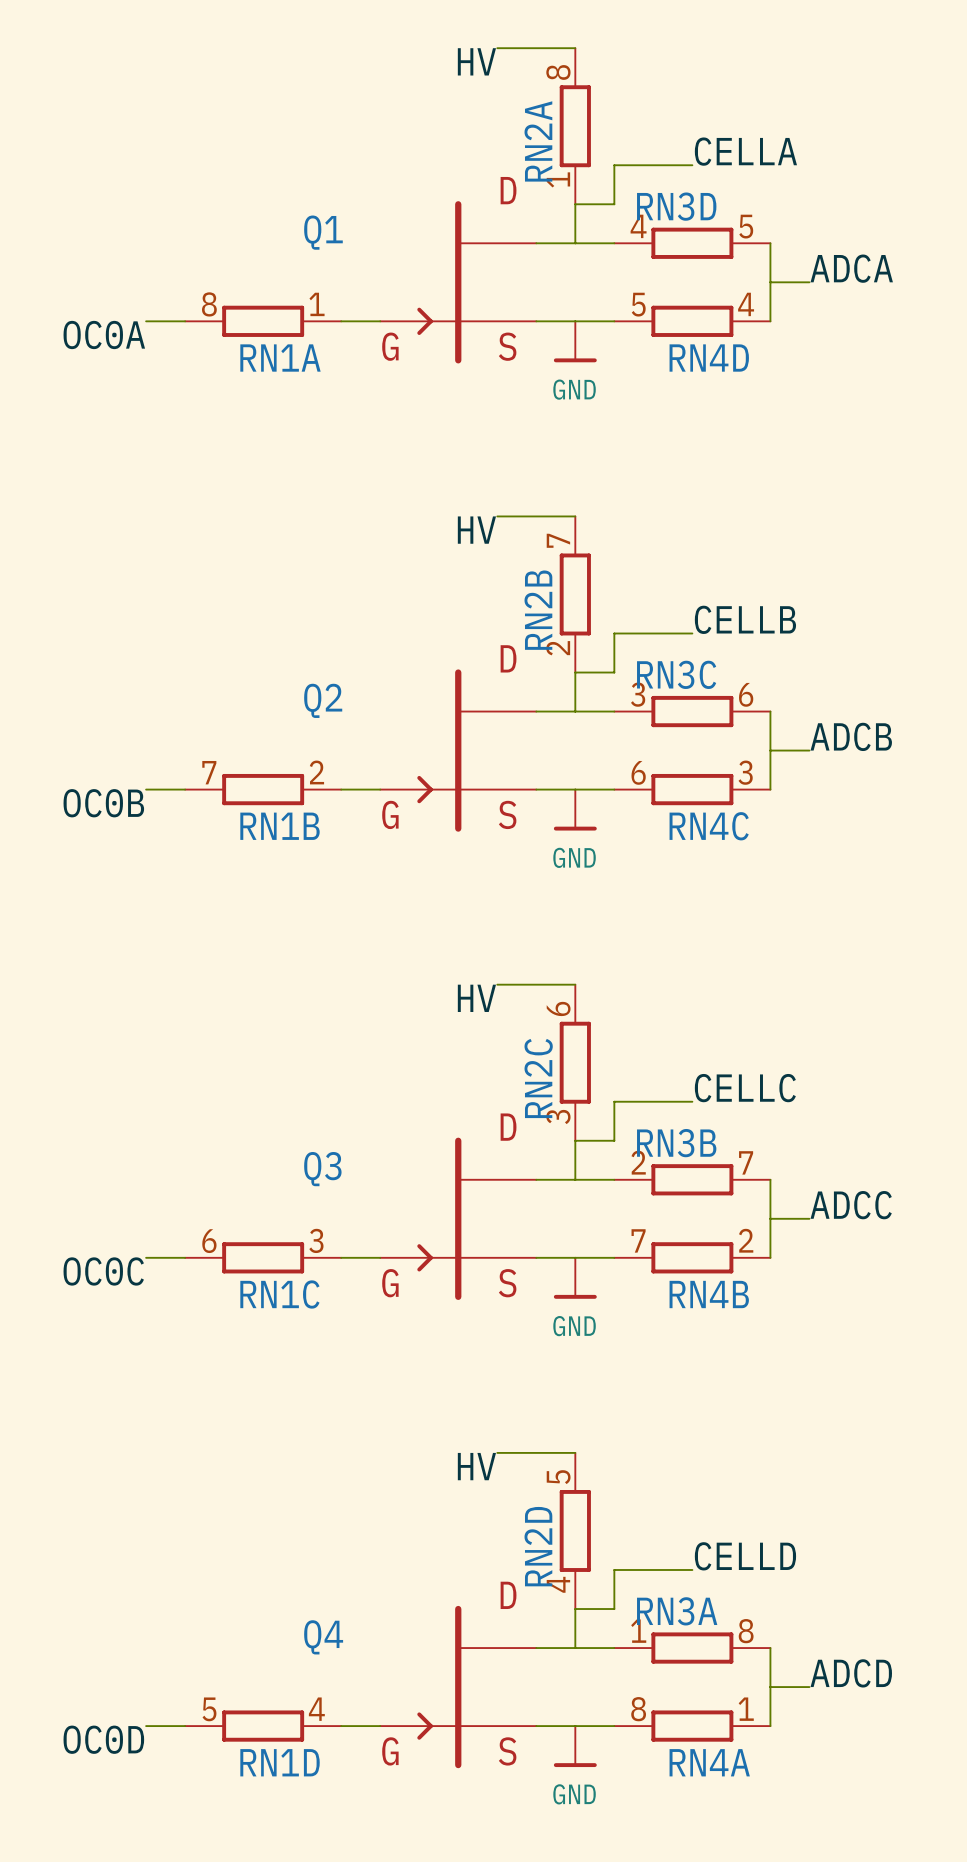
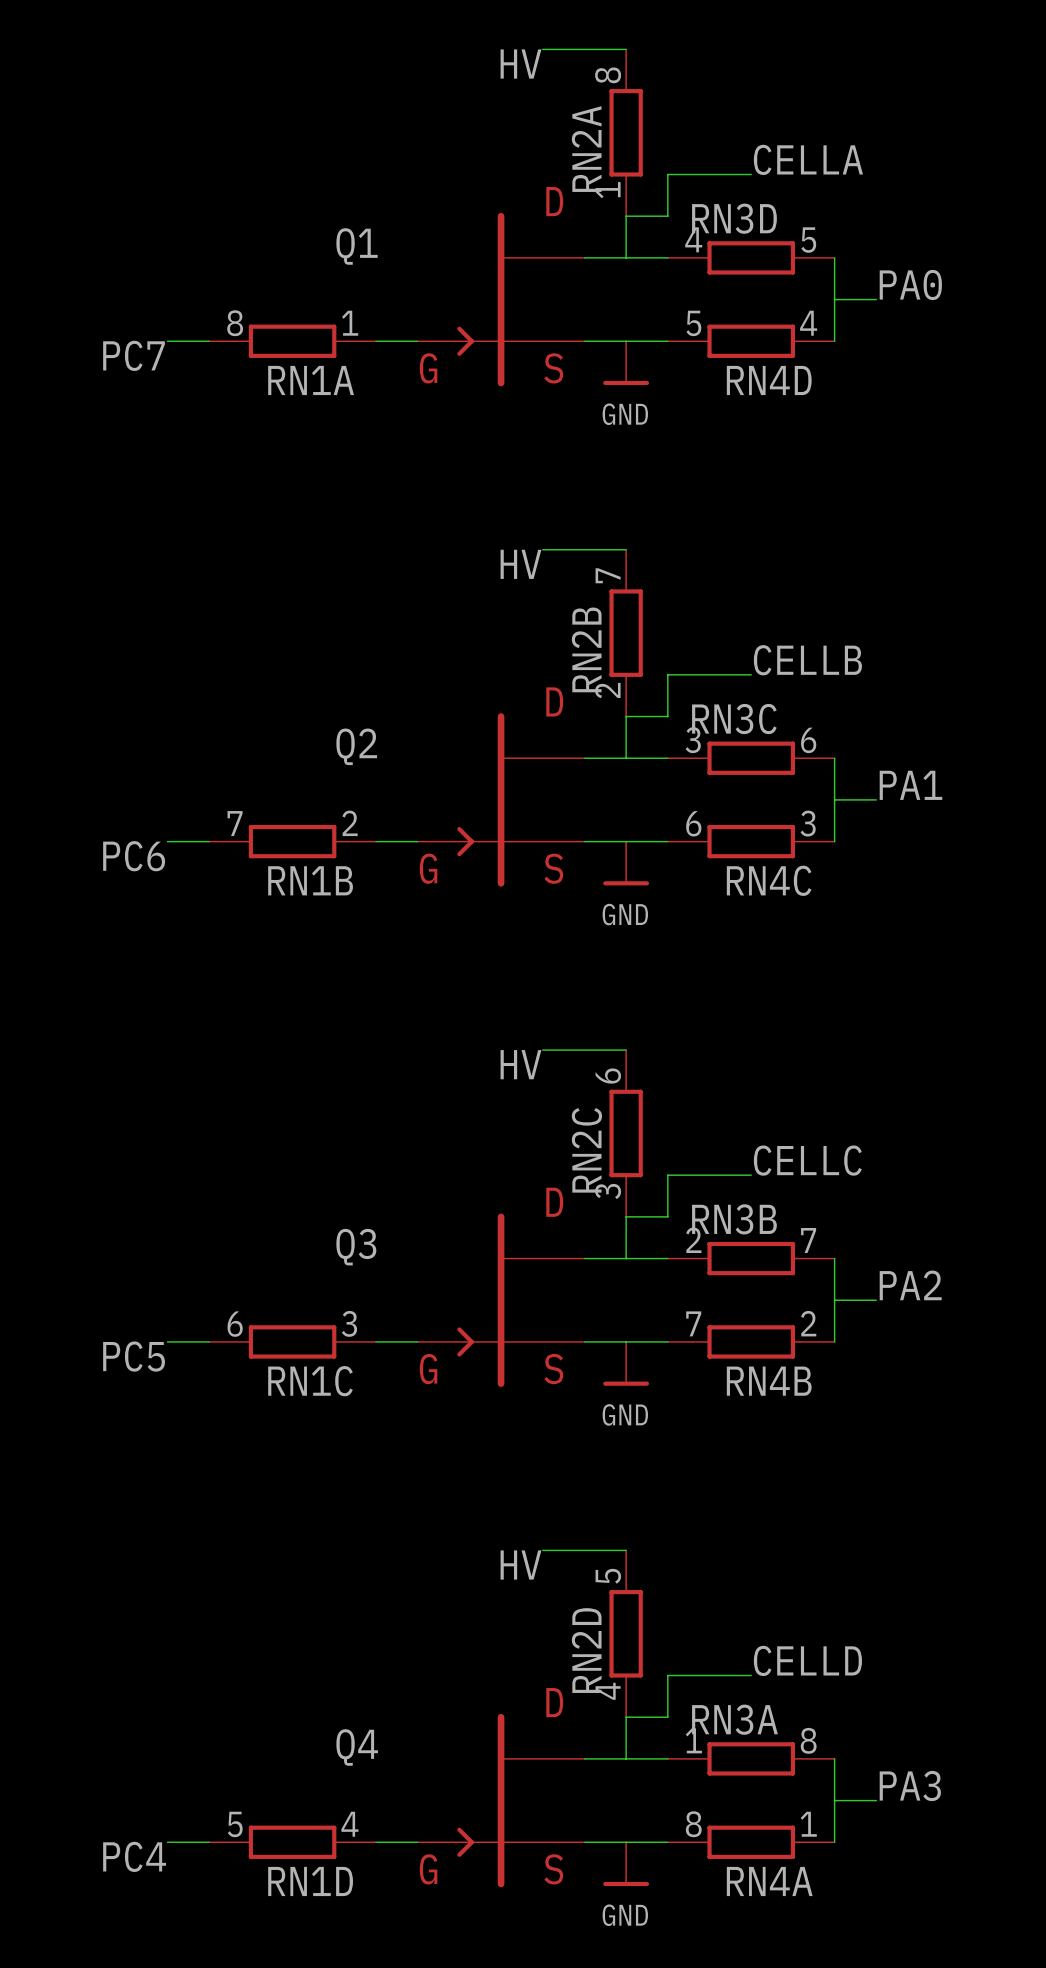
label: ADCA (851, 268) -> PA0 (910, 284)
label: OC0A (104, 334) -> PC7 (134, 355)
label: ADCB (851, 736) -> PA1 (910, 785)
label: OC0B (103, 803) -> PC6 (134, 856)
label: ADCC (851, 1205) -> PA2 (910, 1285)
label: OC0C (103, 1271) -> PC5 (134, 1356)
label: ADCD (851, 1673) -> PA3 (910, 1786)
label: OC0D (103, 1739) -> PC4 (134, 1856)

